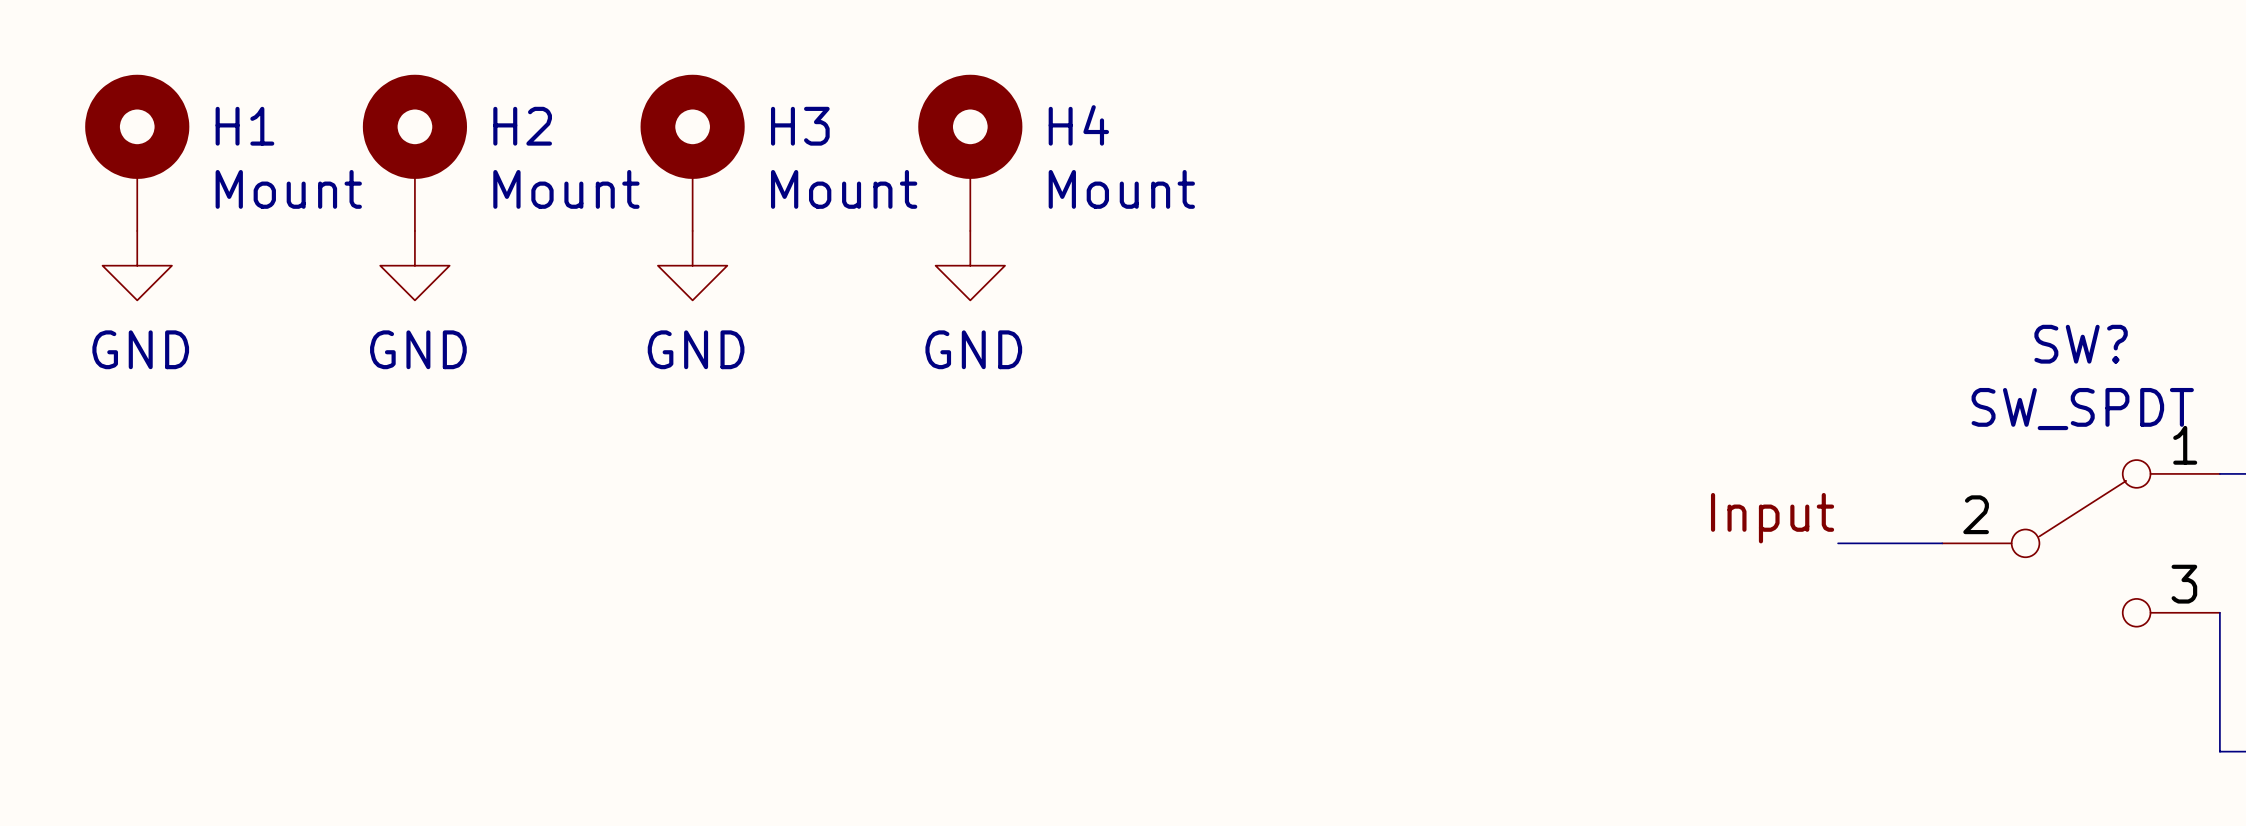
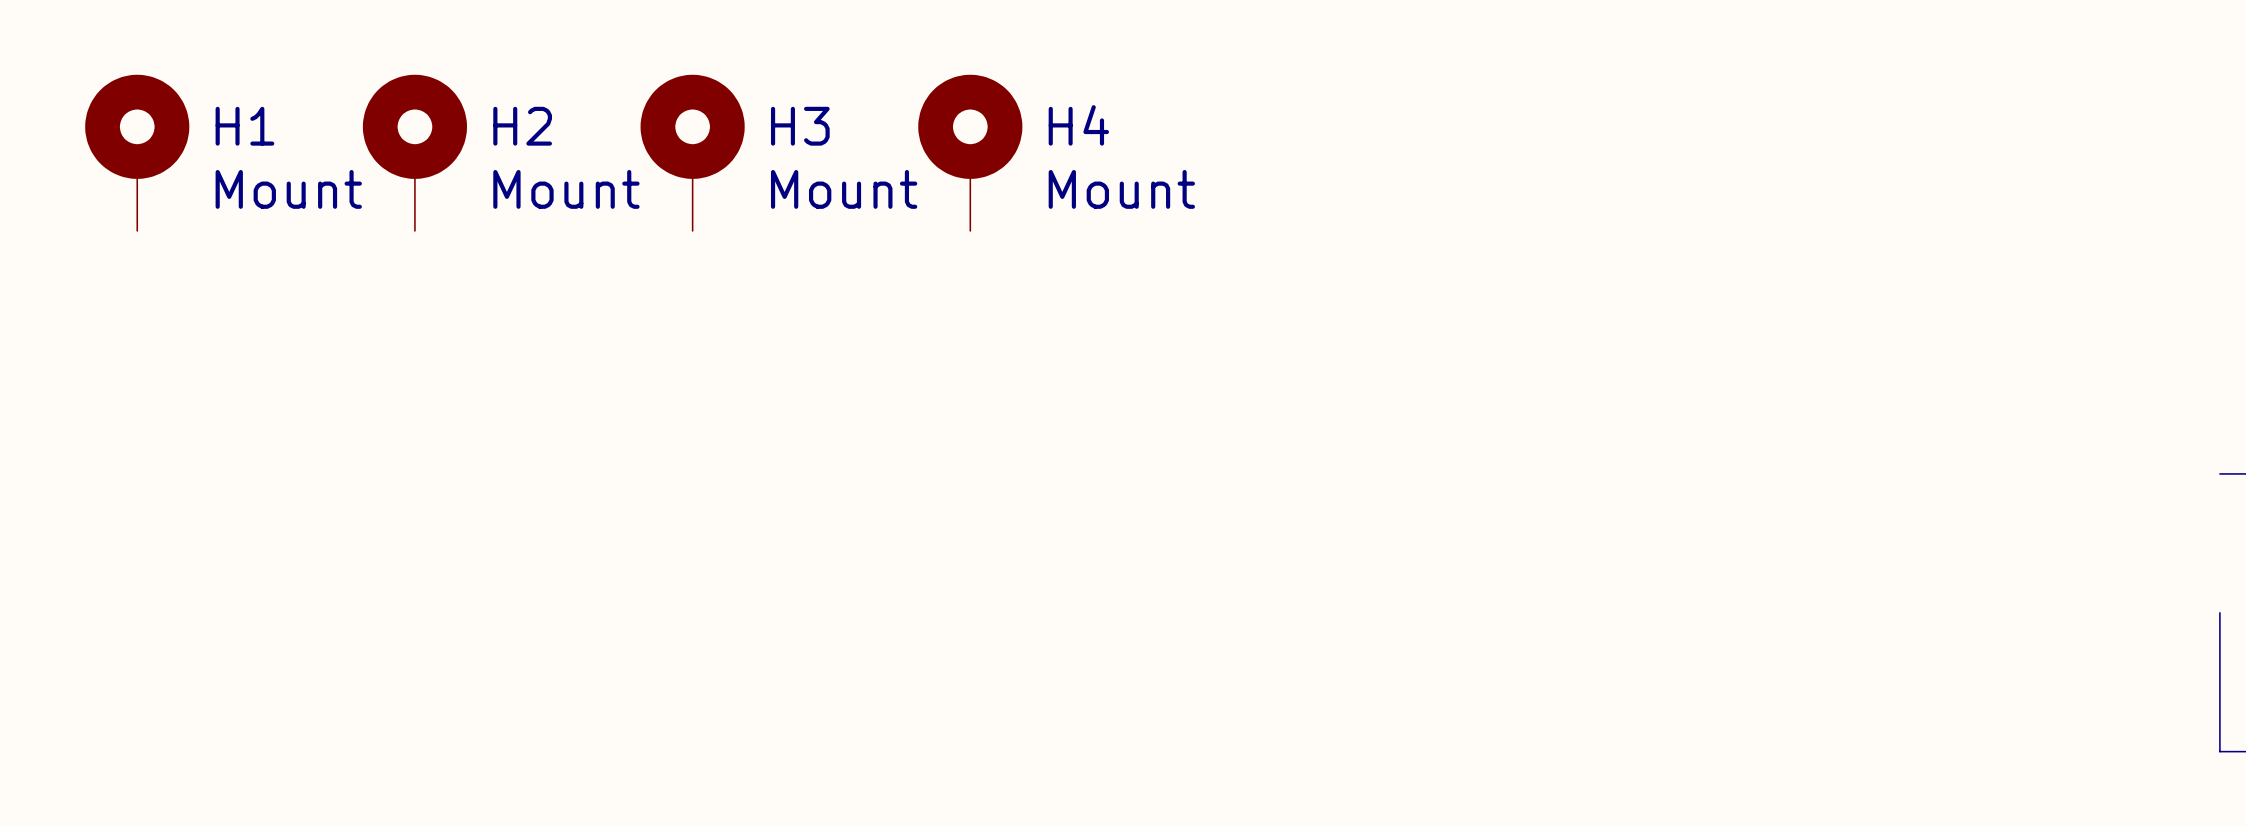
power symbol: GND (137, 265) -> none
power symbol: GND (414, 265) -> none
power symbol: GND (692, 265) -> none
power symbol: GND (970, 265) -> none
label: Input (1772, 518) -> none
wire: (1838, 543) (1942, 543) -> none
SW?: SW_SPDT (2081, 543) -> none

